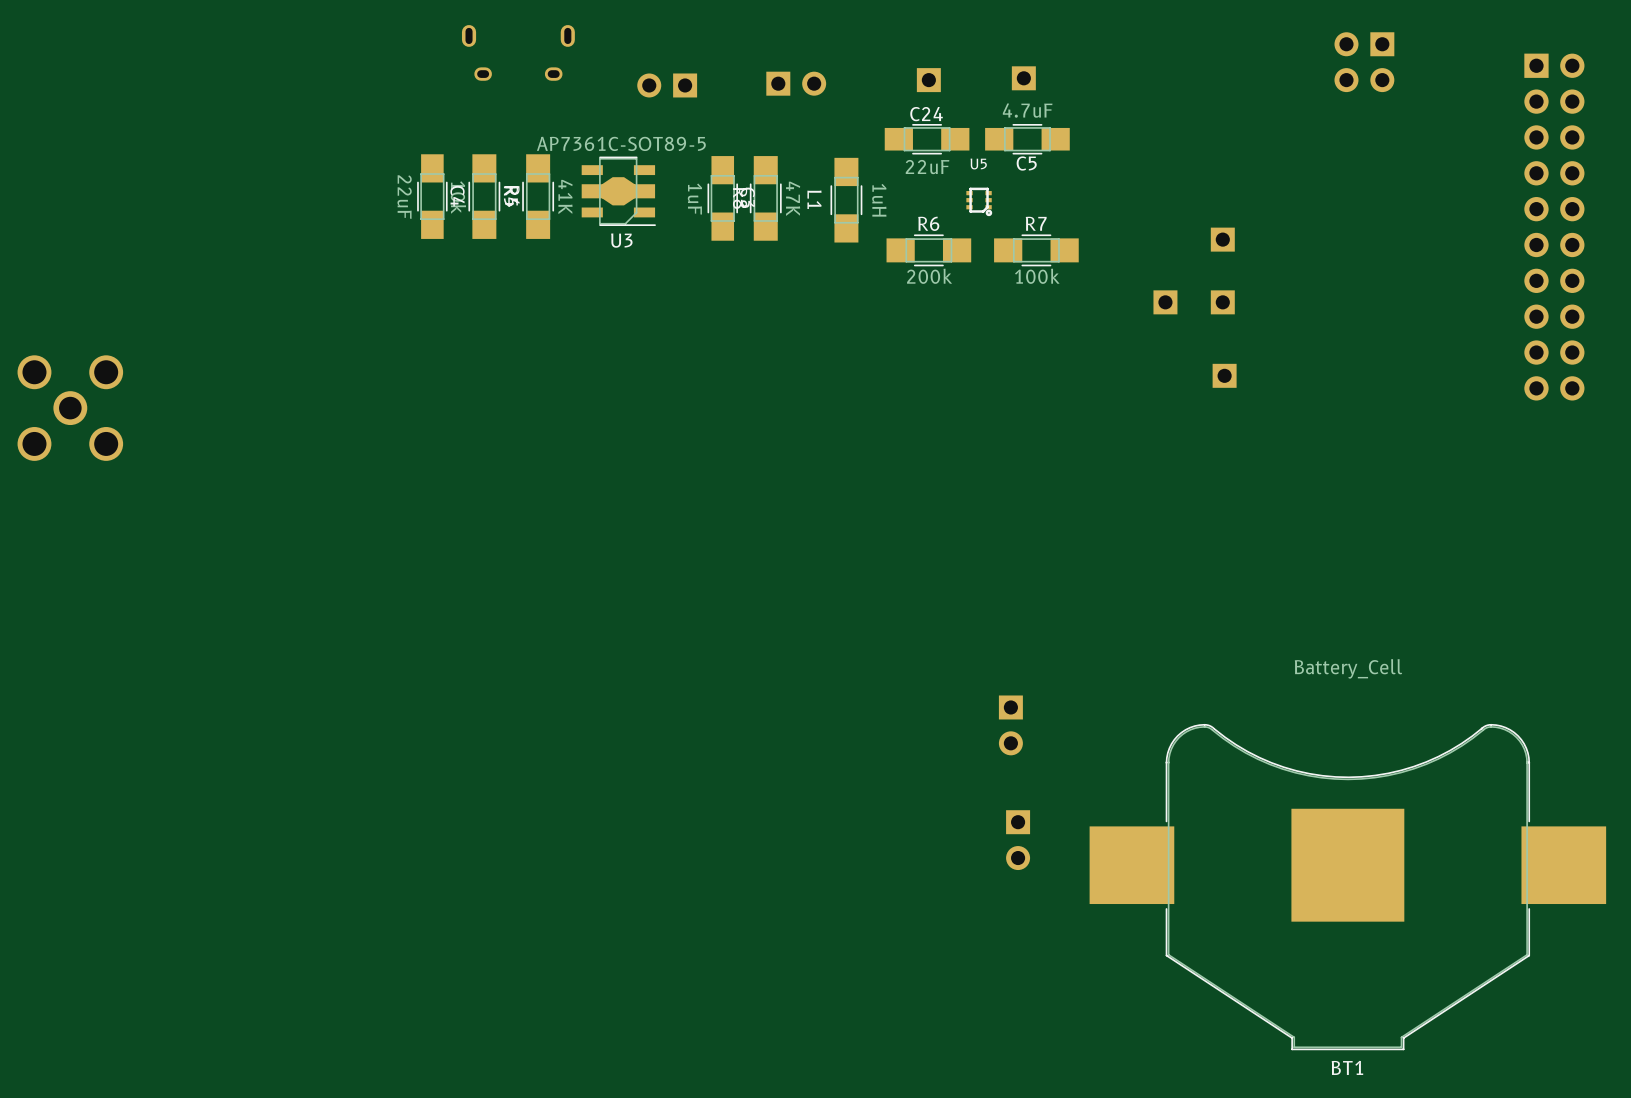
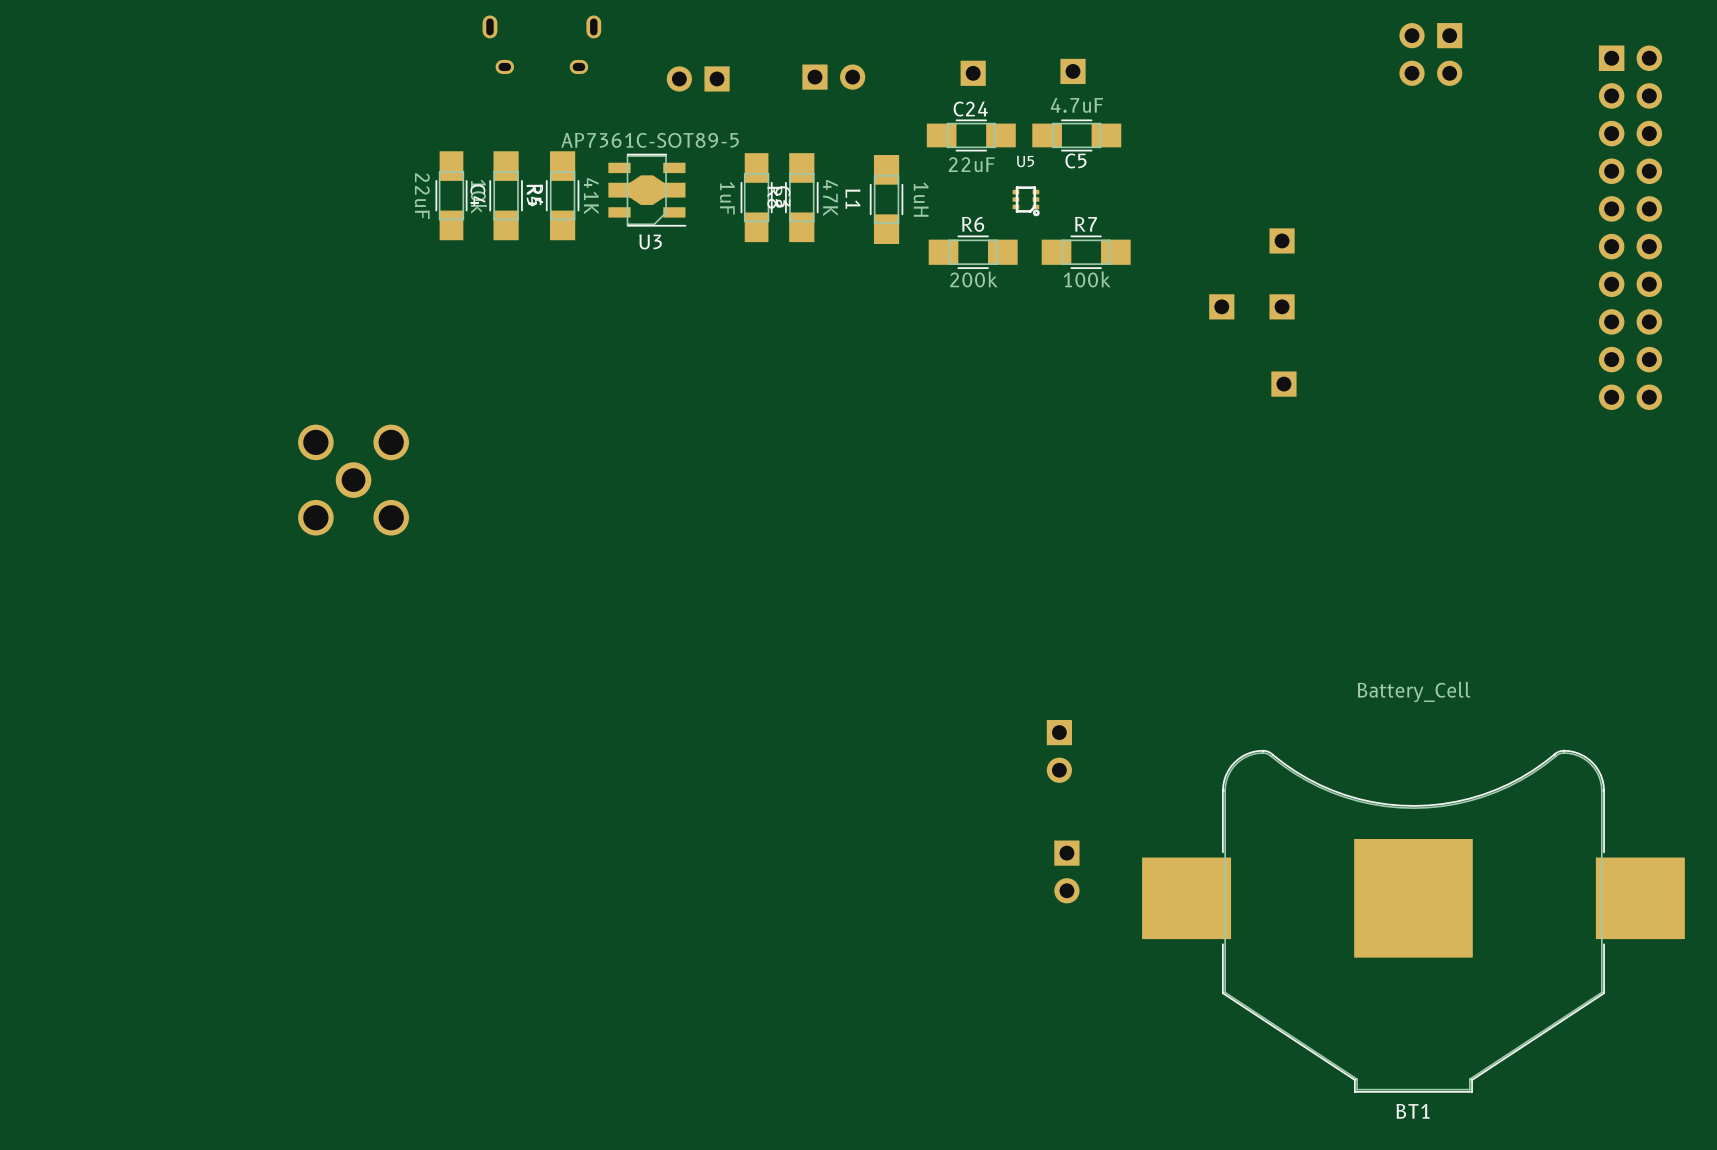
part position: (70, 408) -> (353, 480)

